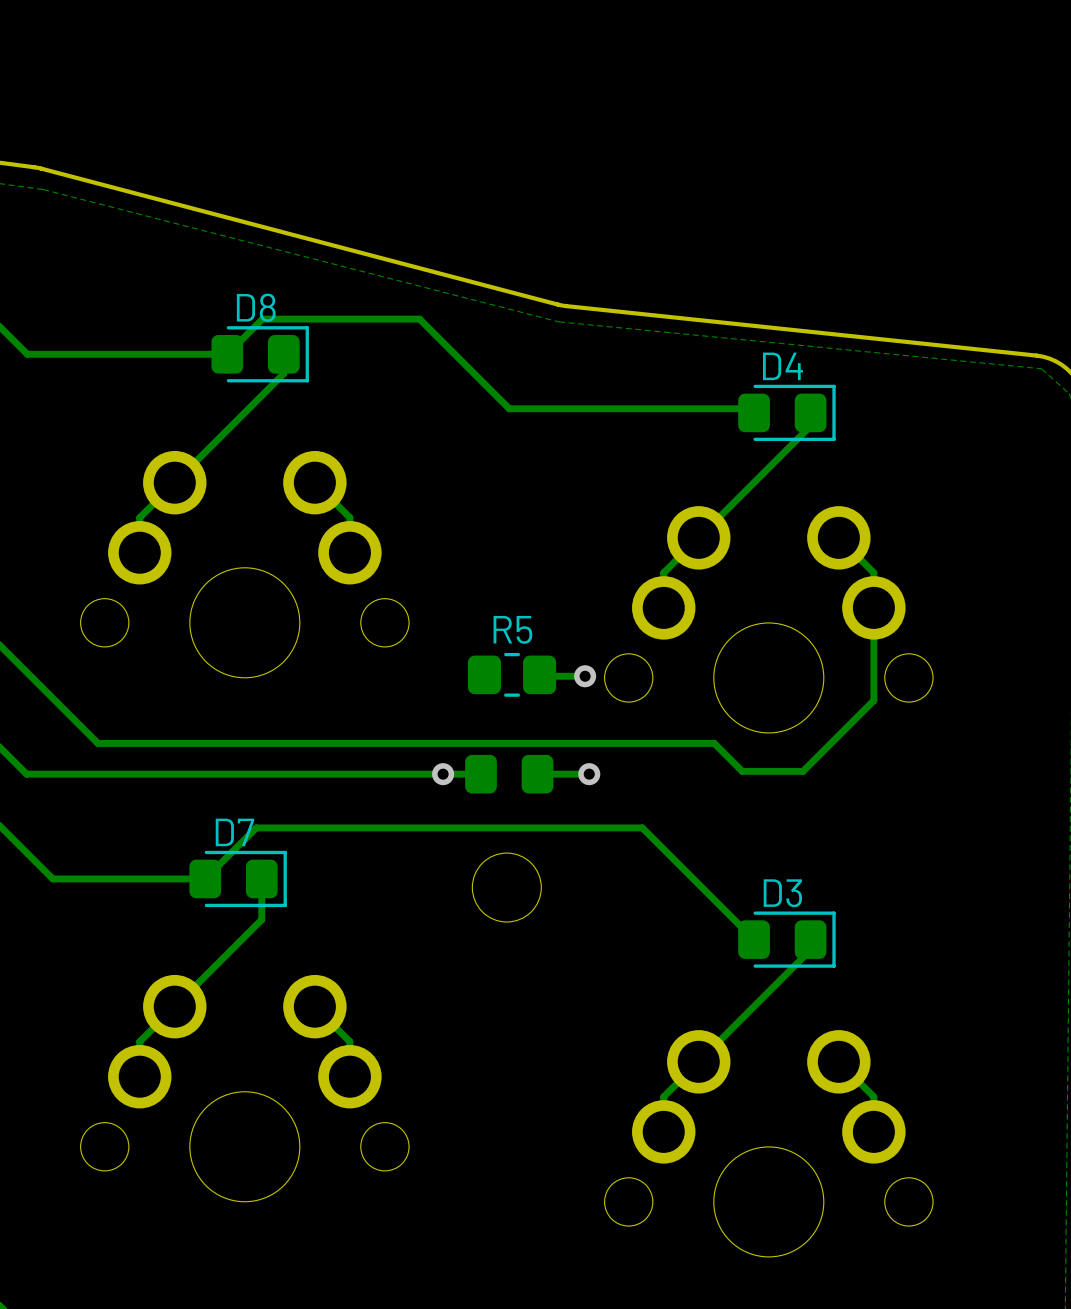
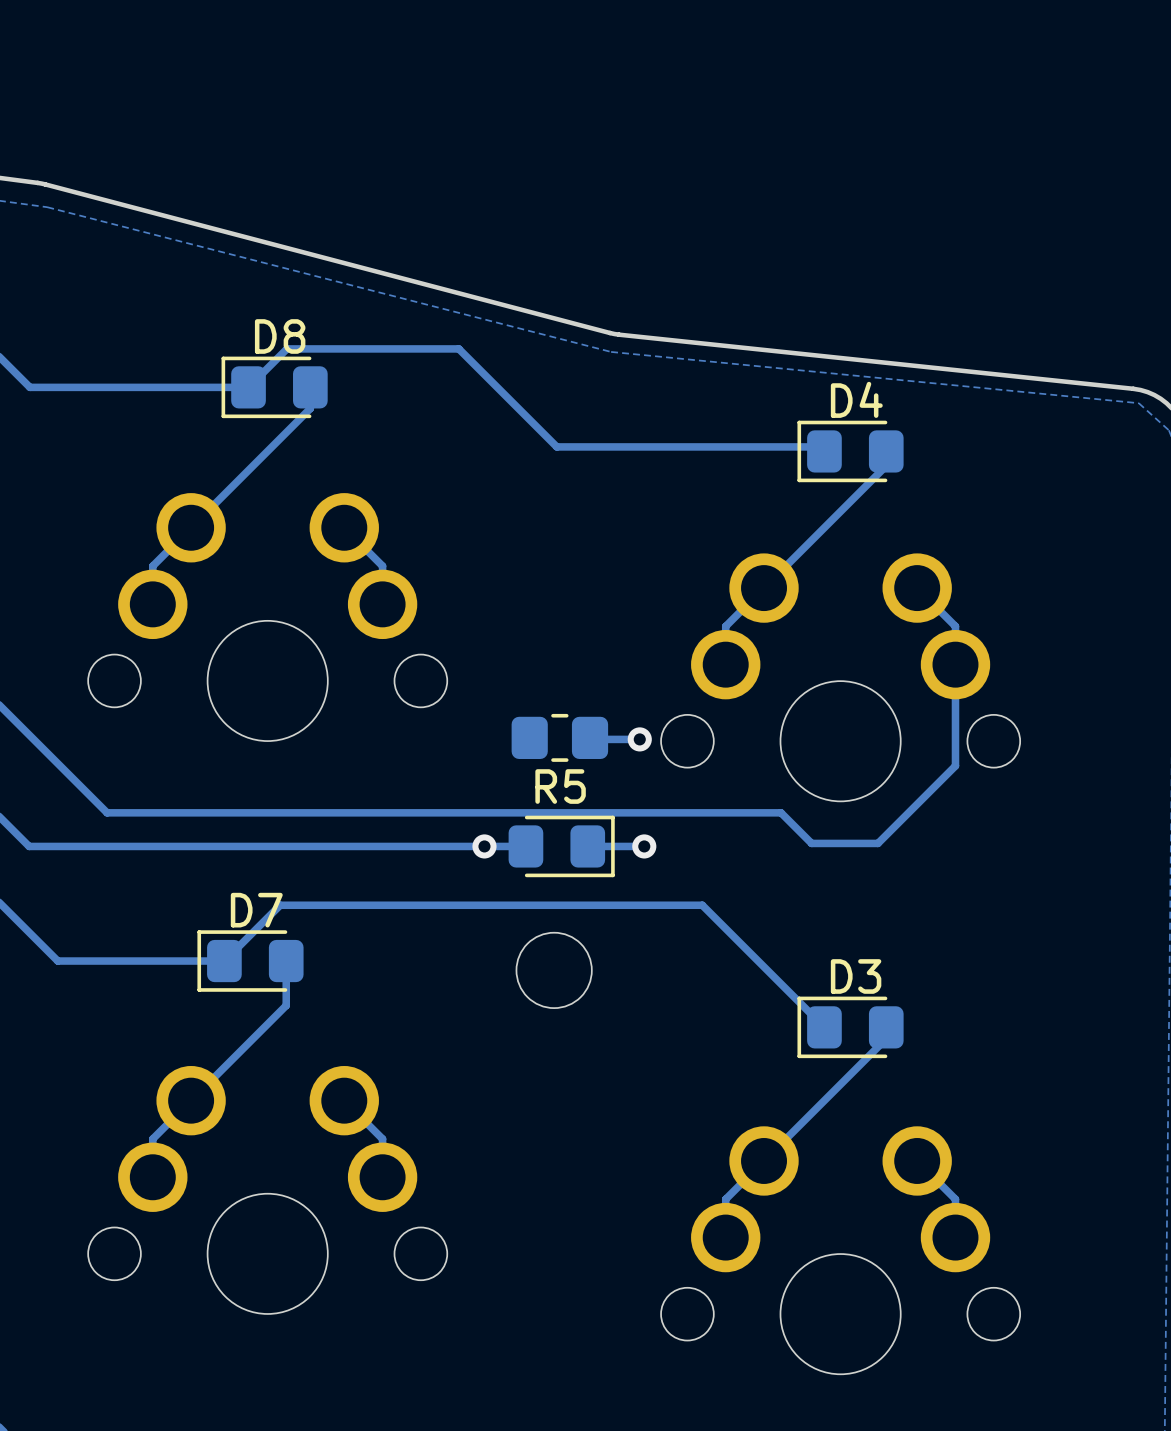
D8 rotation: 0° (260, 354) -> 180° (274, 387)
D4 rotation: 0° (786, 412) -> 180° (850, 451)
R5 name position: R5 (512, 629) -> R5 (560, 786)
part footprint: [465, 754, 554, 794] -> [508, 815, 615, 878]
D7 rotation: 0° (238, 878) -> 180° (250, 961)
D3 rotation: 0° (786, 939) -> 180° (850, 1027)

